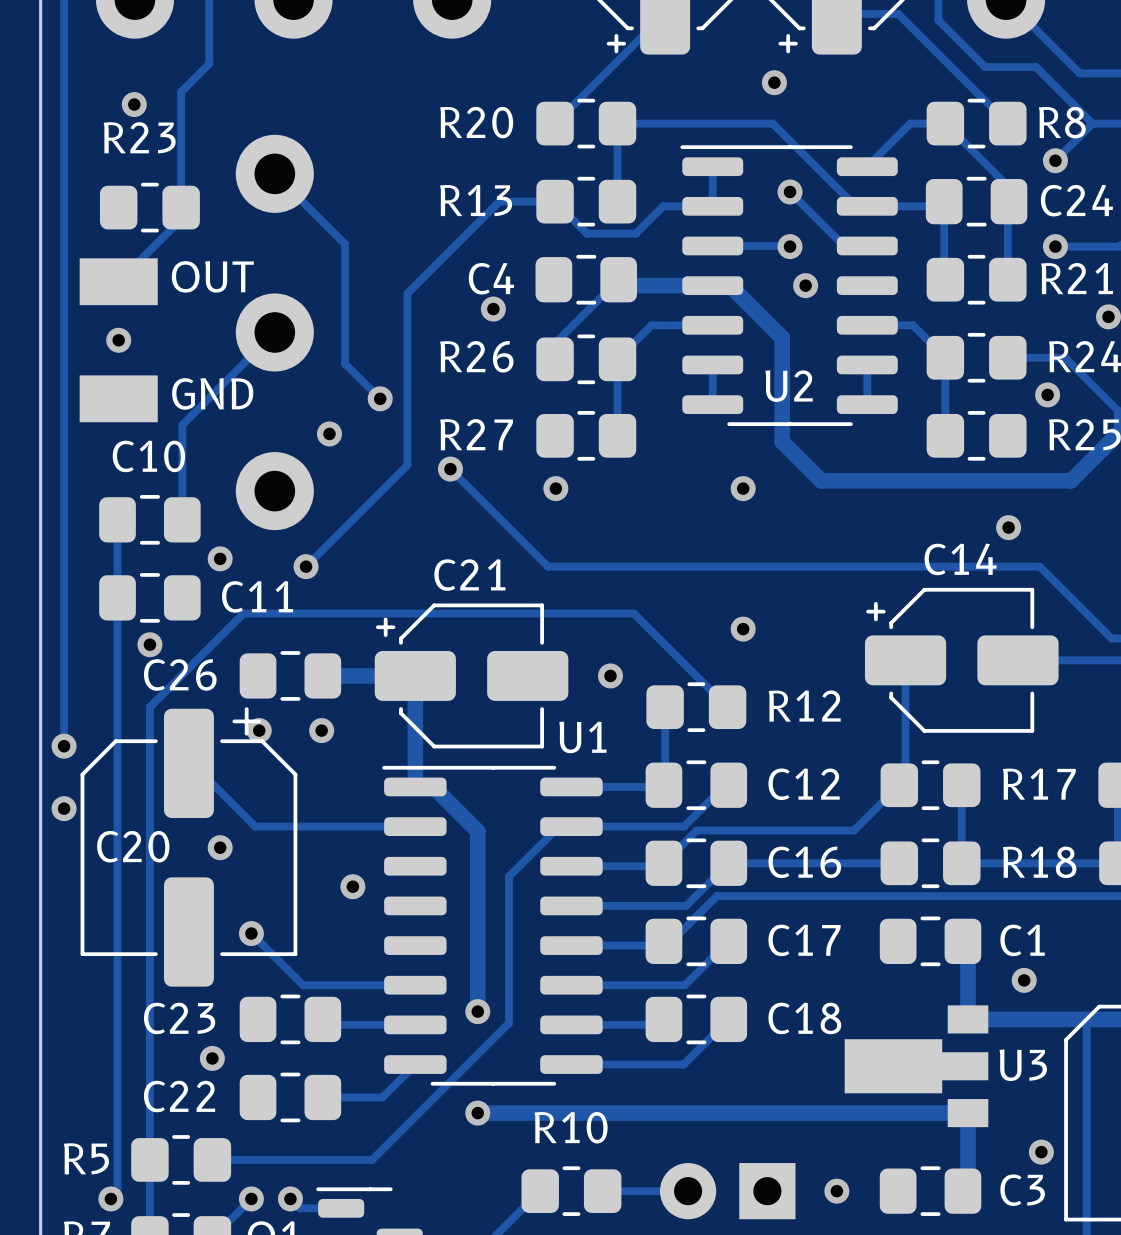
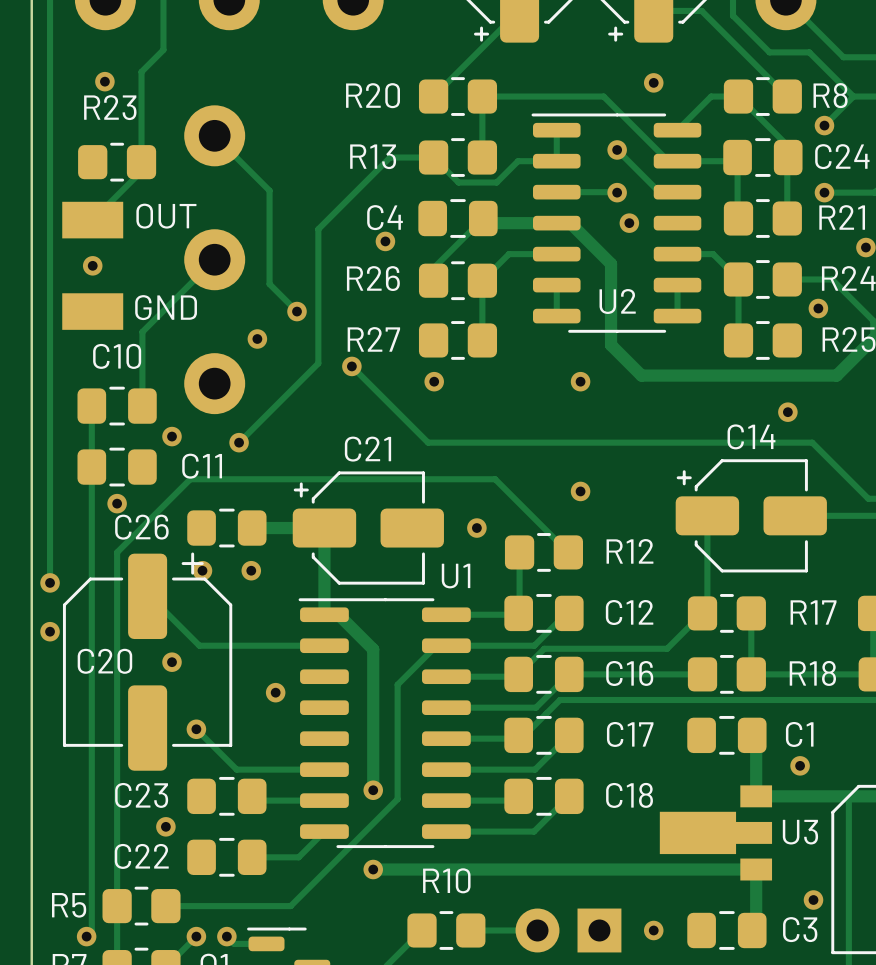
via position: (774, 82) -> (653, 82)

